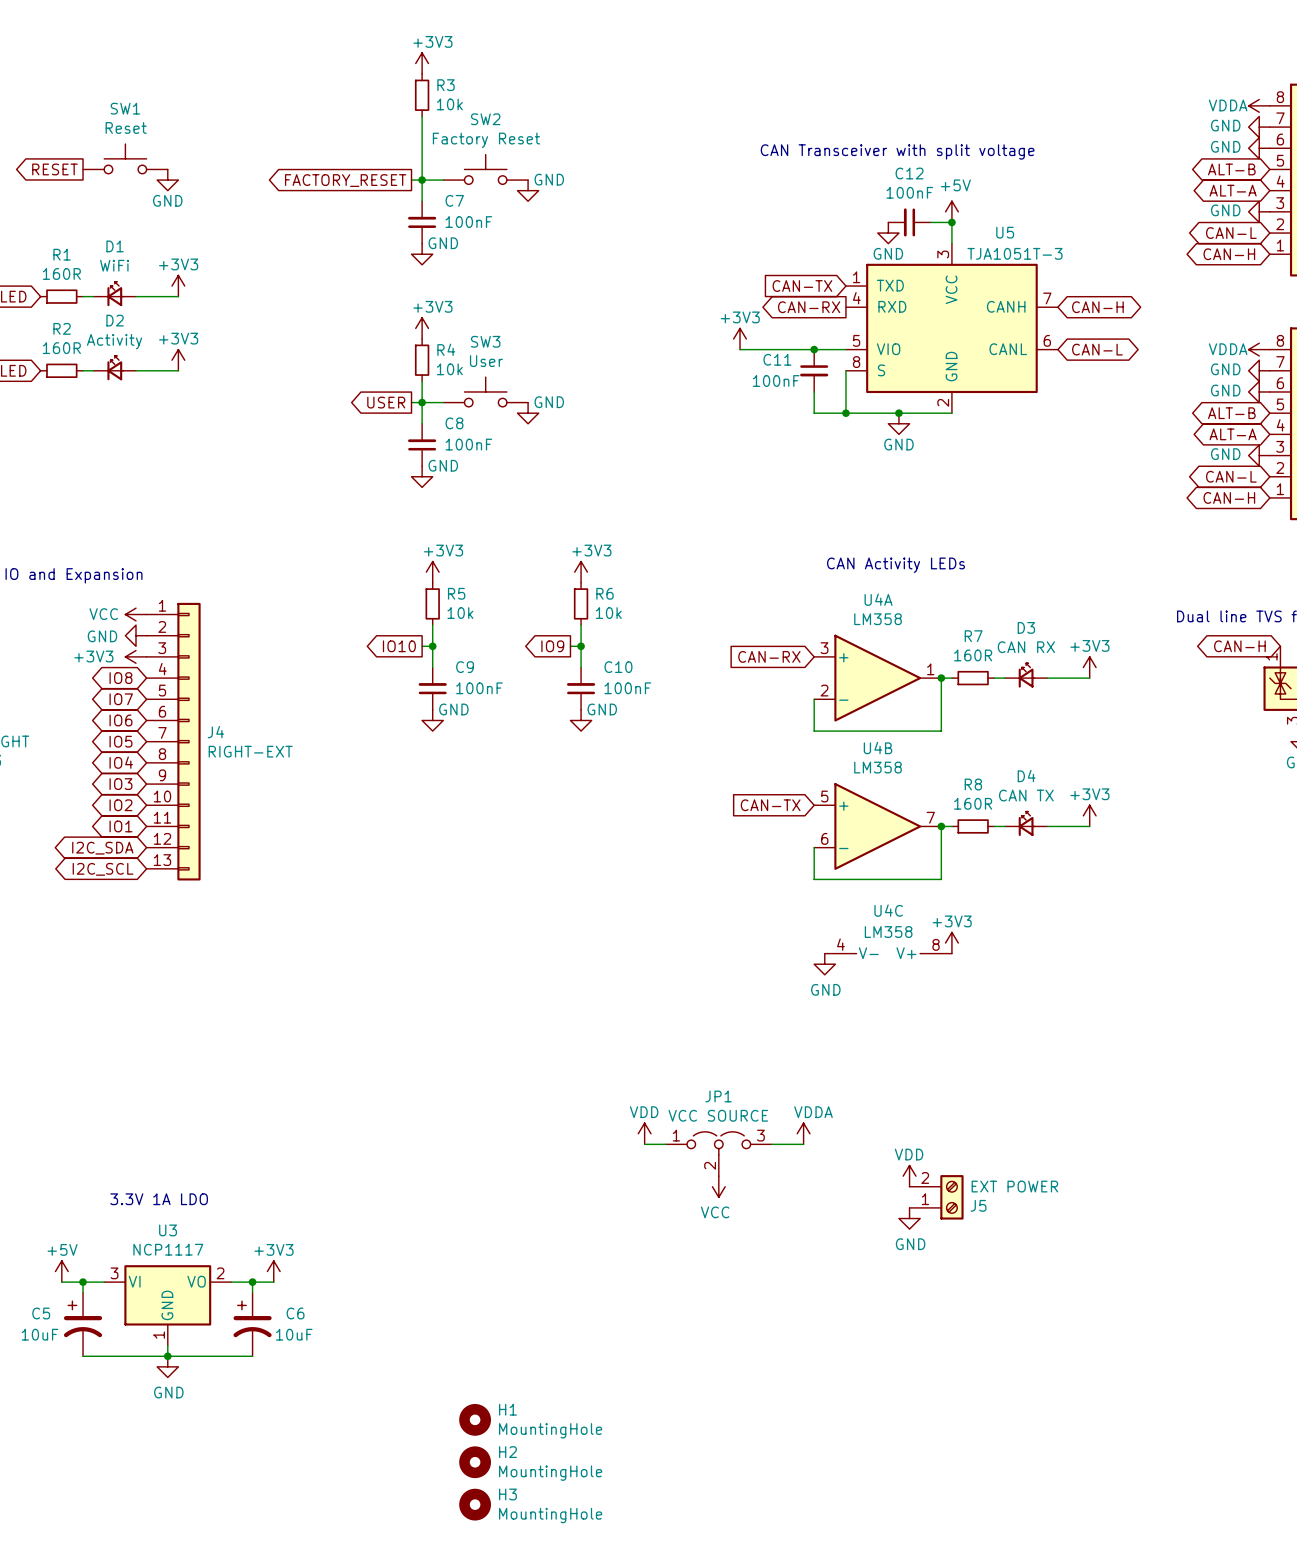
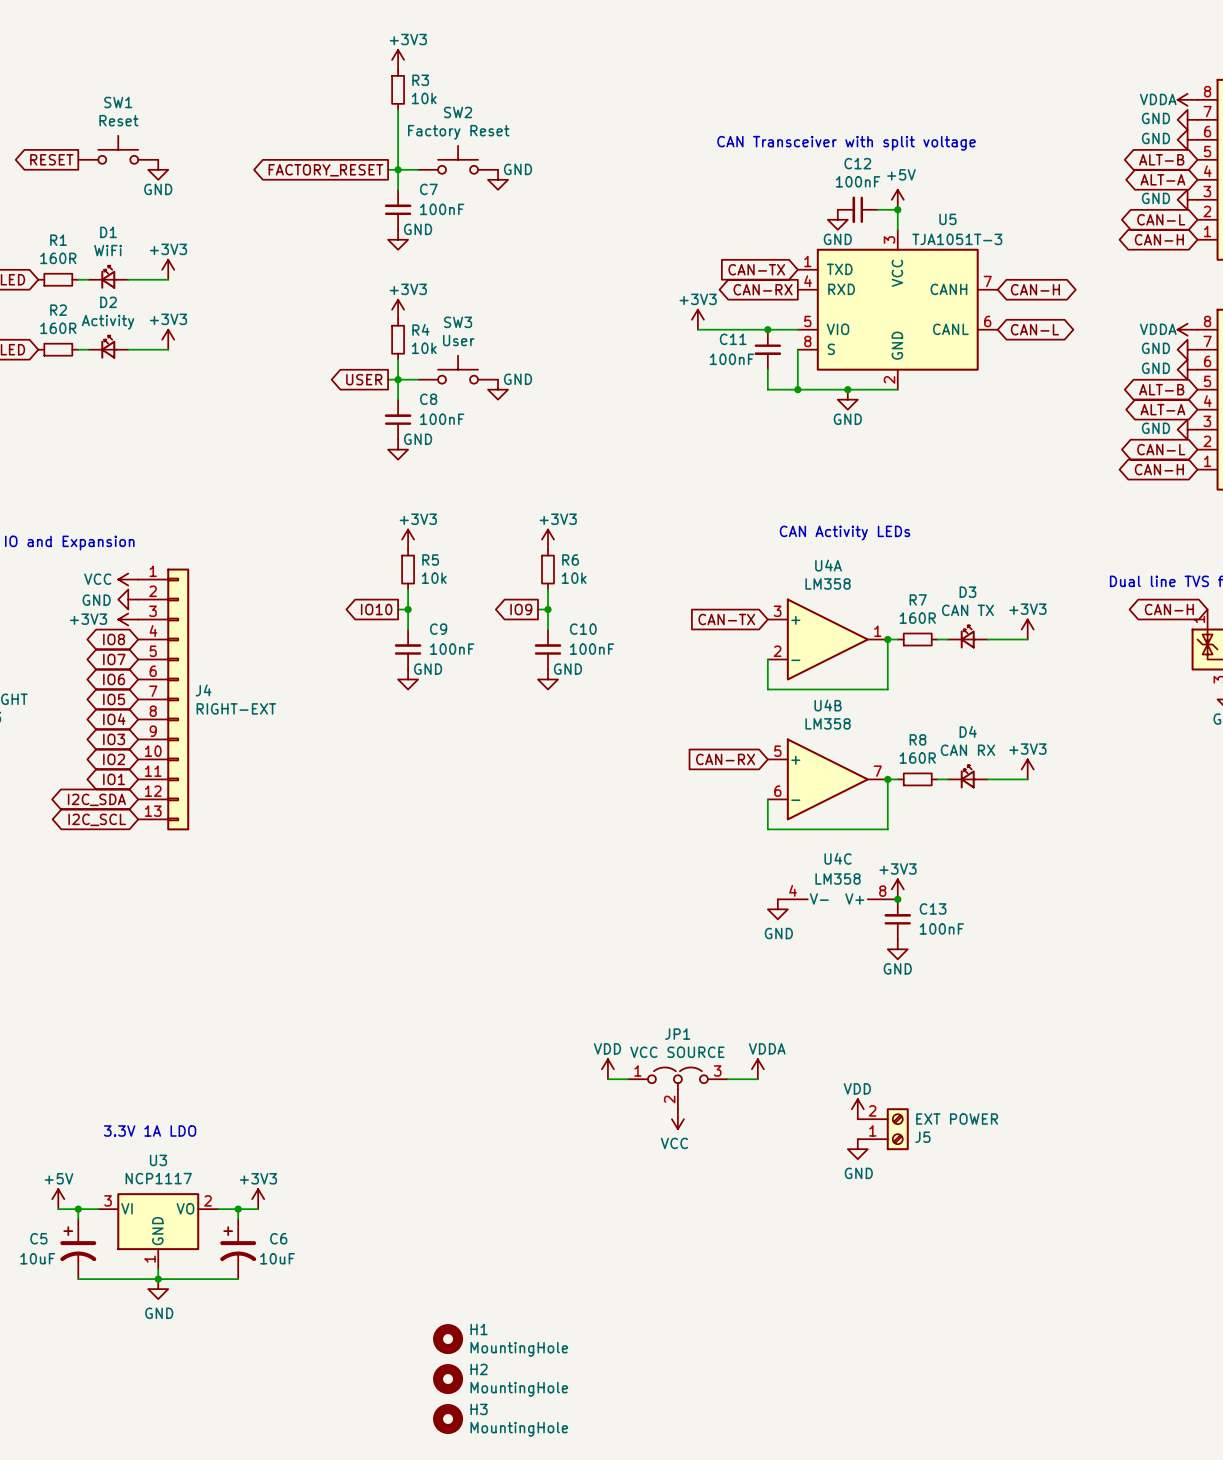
D3 value: CAN RX (1026, 647) -> CAN TX (967, 610)
global label: CAN-RX (769, 656) -> CAN-TX (726, 619)
D4 value: CAN TX (1026, 795) -> CAN RX (967, 750)
global label: CAN-TX (770, 805) -> CAN-RX (725, 759)
junction: none -> (897, 899)
C13: none -> 100nF (897, 919)
power symbol: none -> GND (897, 949)

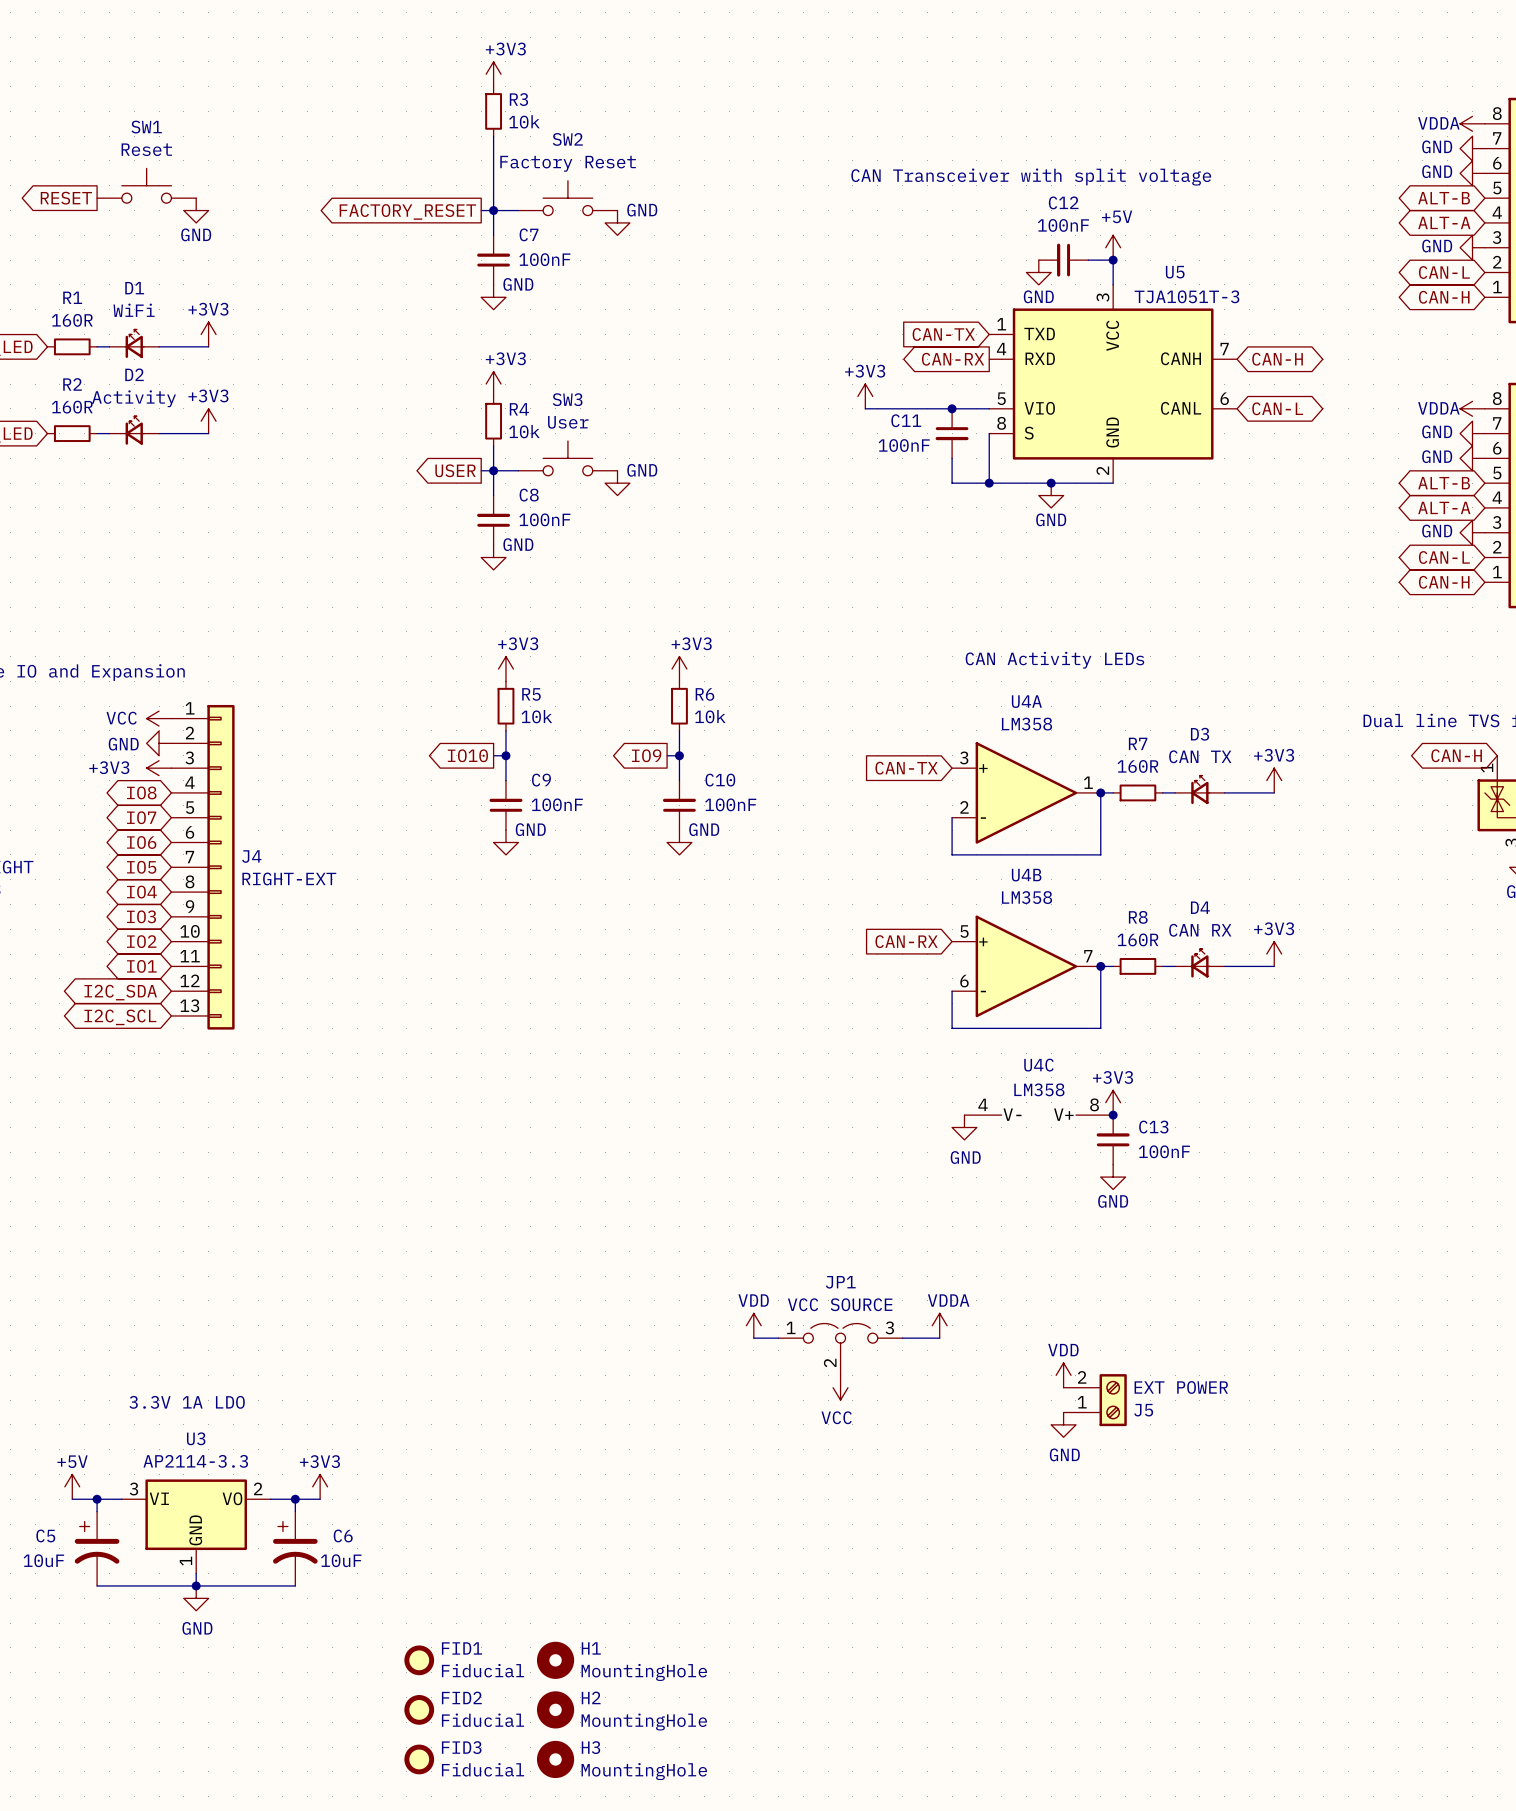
U3 value: NCP1117 (158, 1178) -> AP2114-3.3 (195, 1461)
FID1: none -> Fiducial (419, 1660)
FID2: none -> Fiducial (419, 1709)
FID3: none -> Fiducial (419, 1759)

